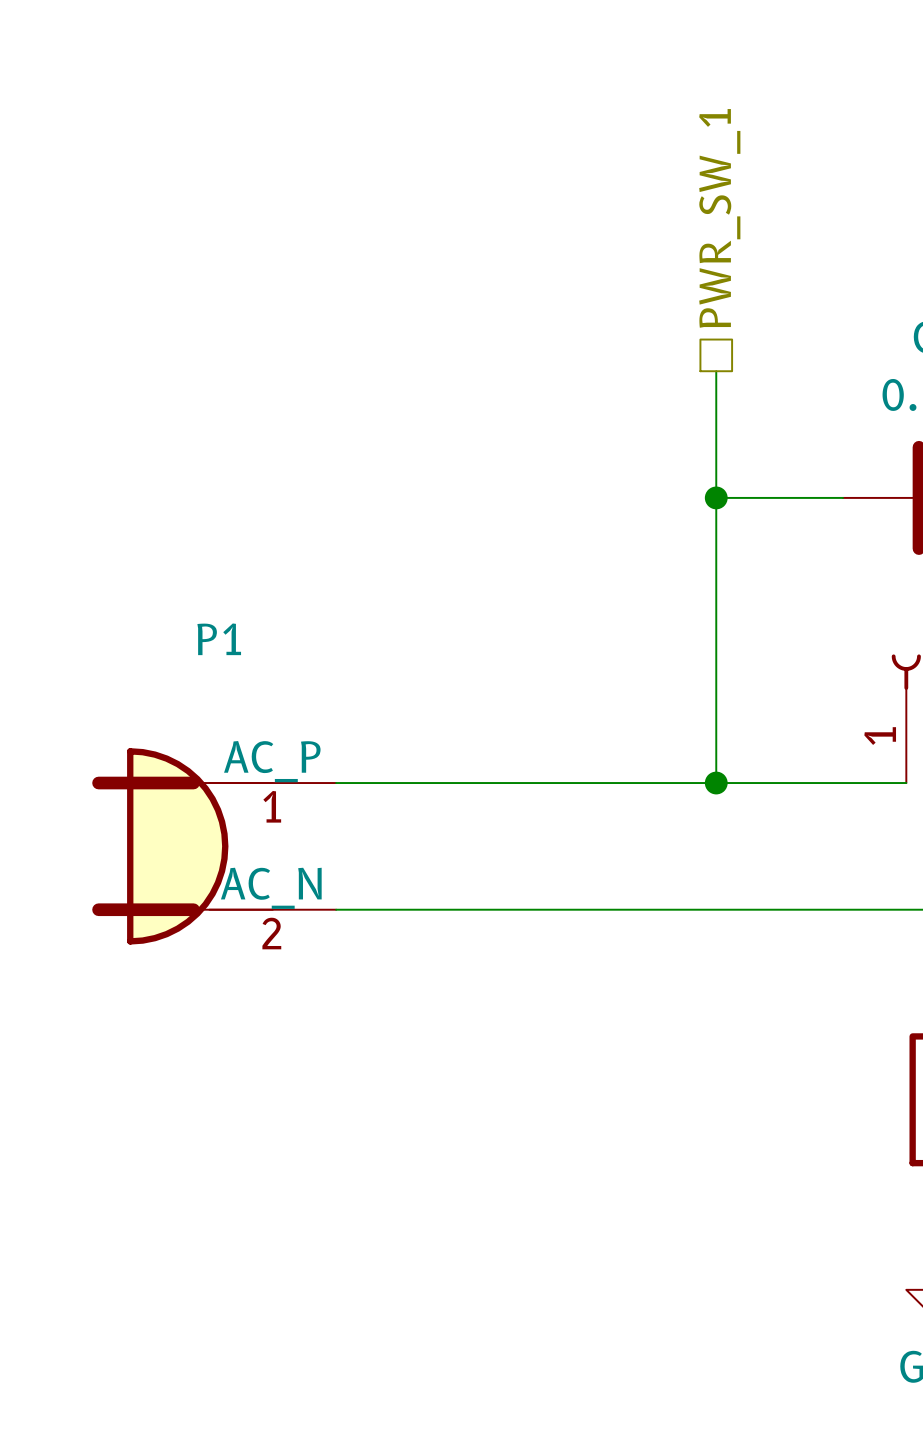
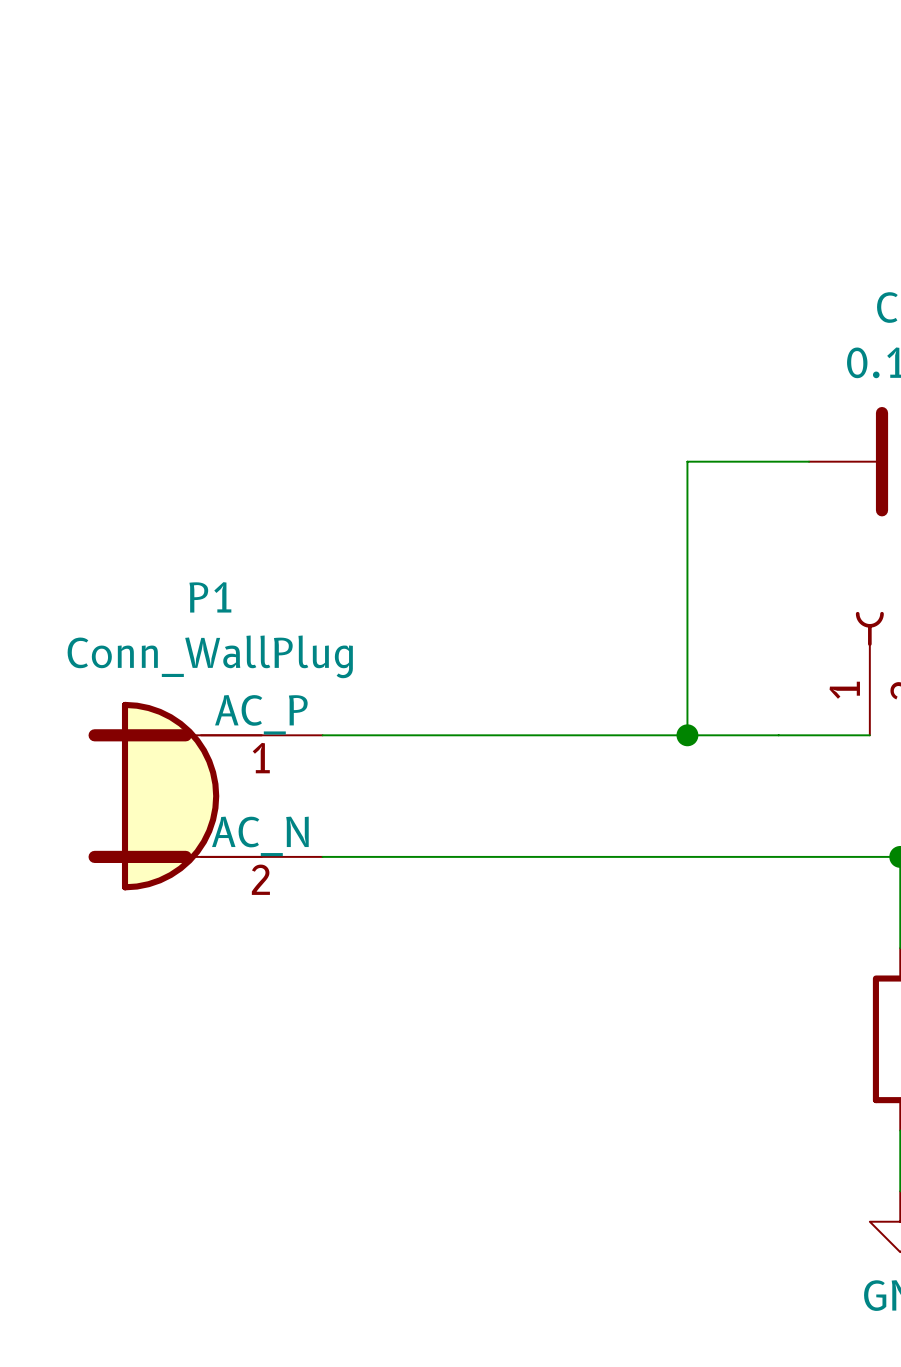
hierarchical label: PWR_SW_1 (719, 218) -> none
wire: (716, 371) (716, 497) -> none
junction: (716, 497) -> none
P1 value: none -> Conn_WallPlug (210, 656)

